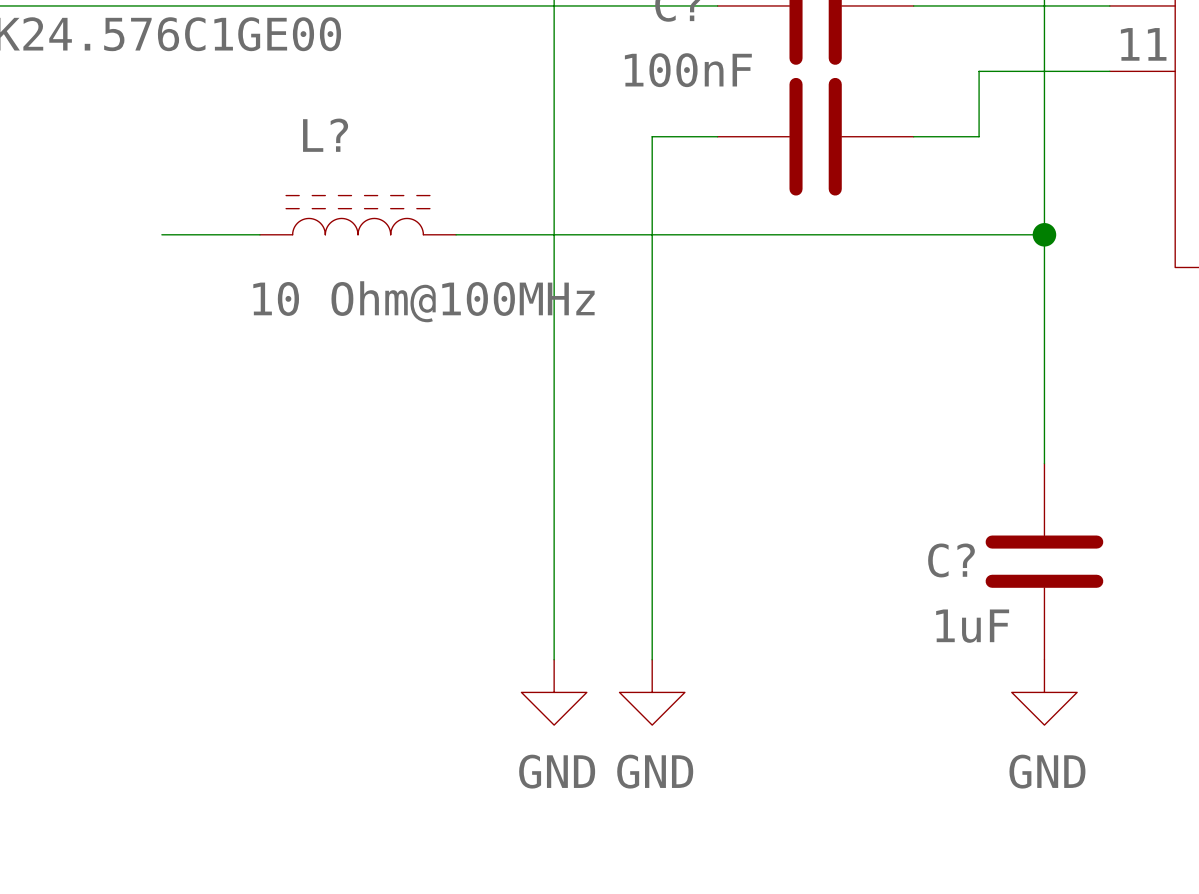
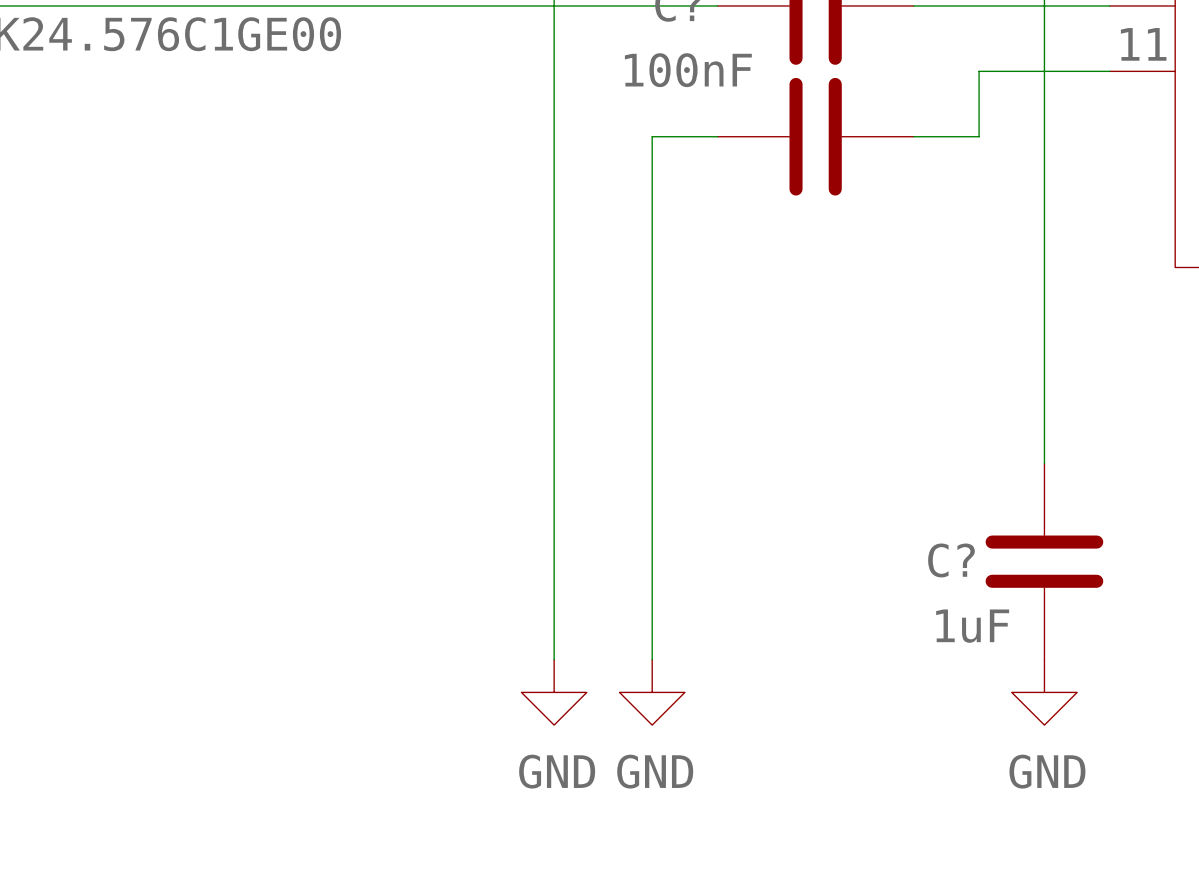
L?: 10 Ohm@100MHz (358, 215) -> none
wire: (161, 234) (259, 234) -> none
wire: (456, 234) (1044, 234) -> none
junction: (1044, 234) -> none

